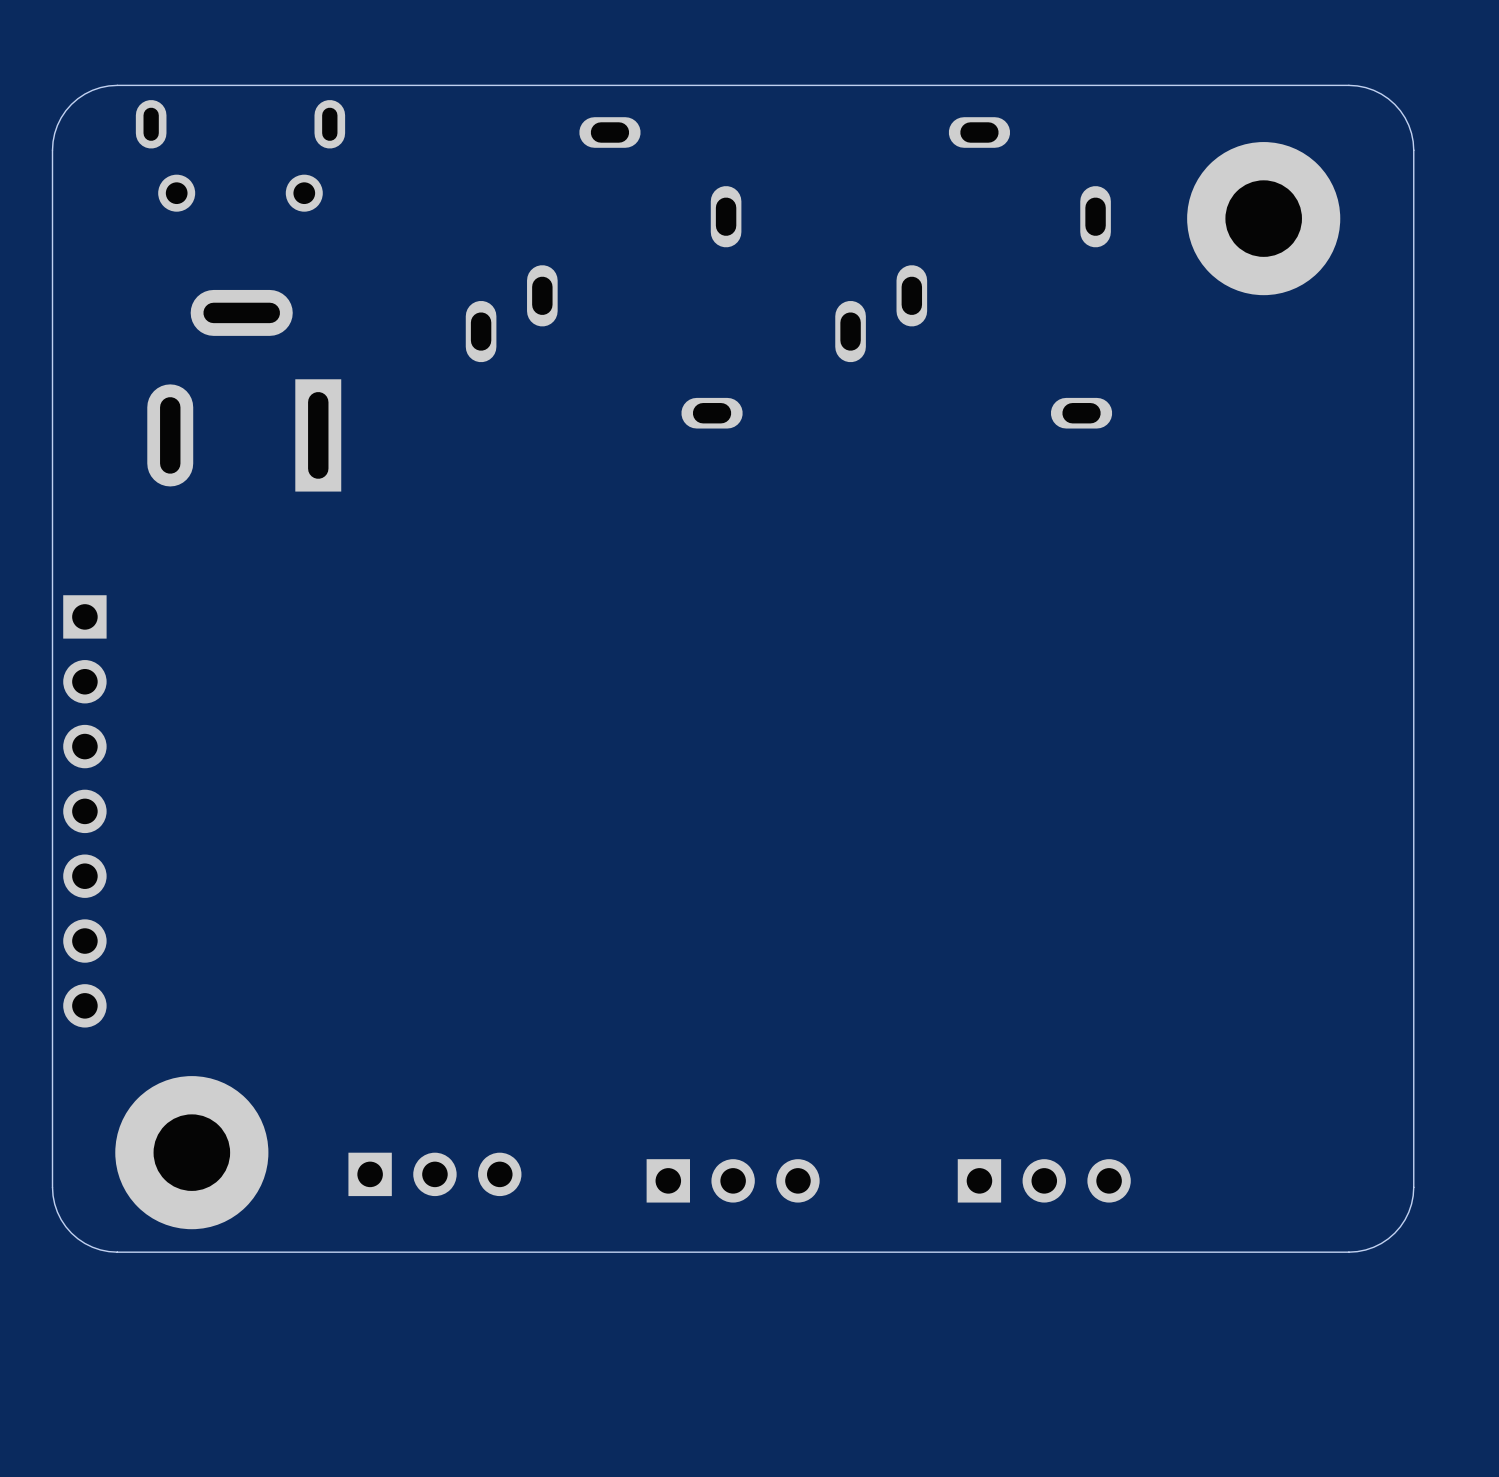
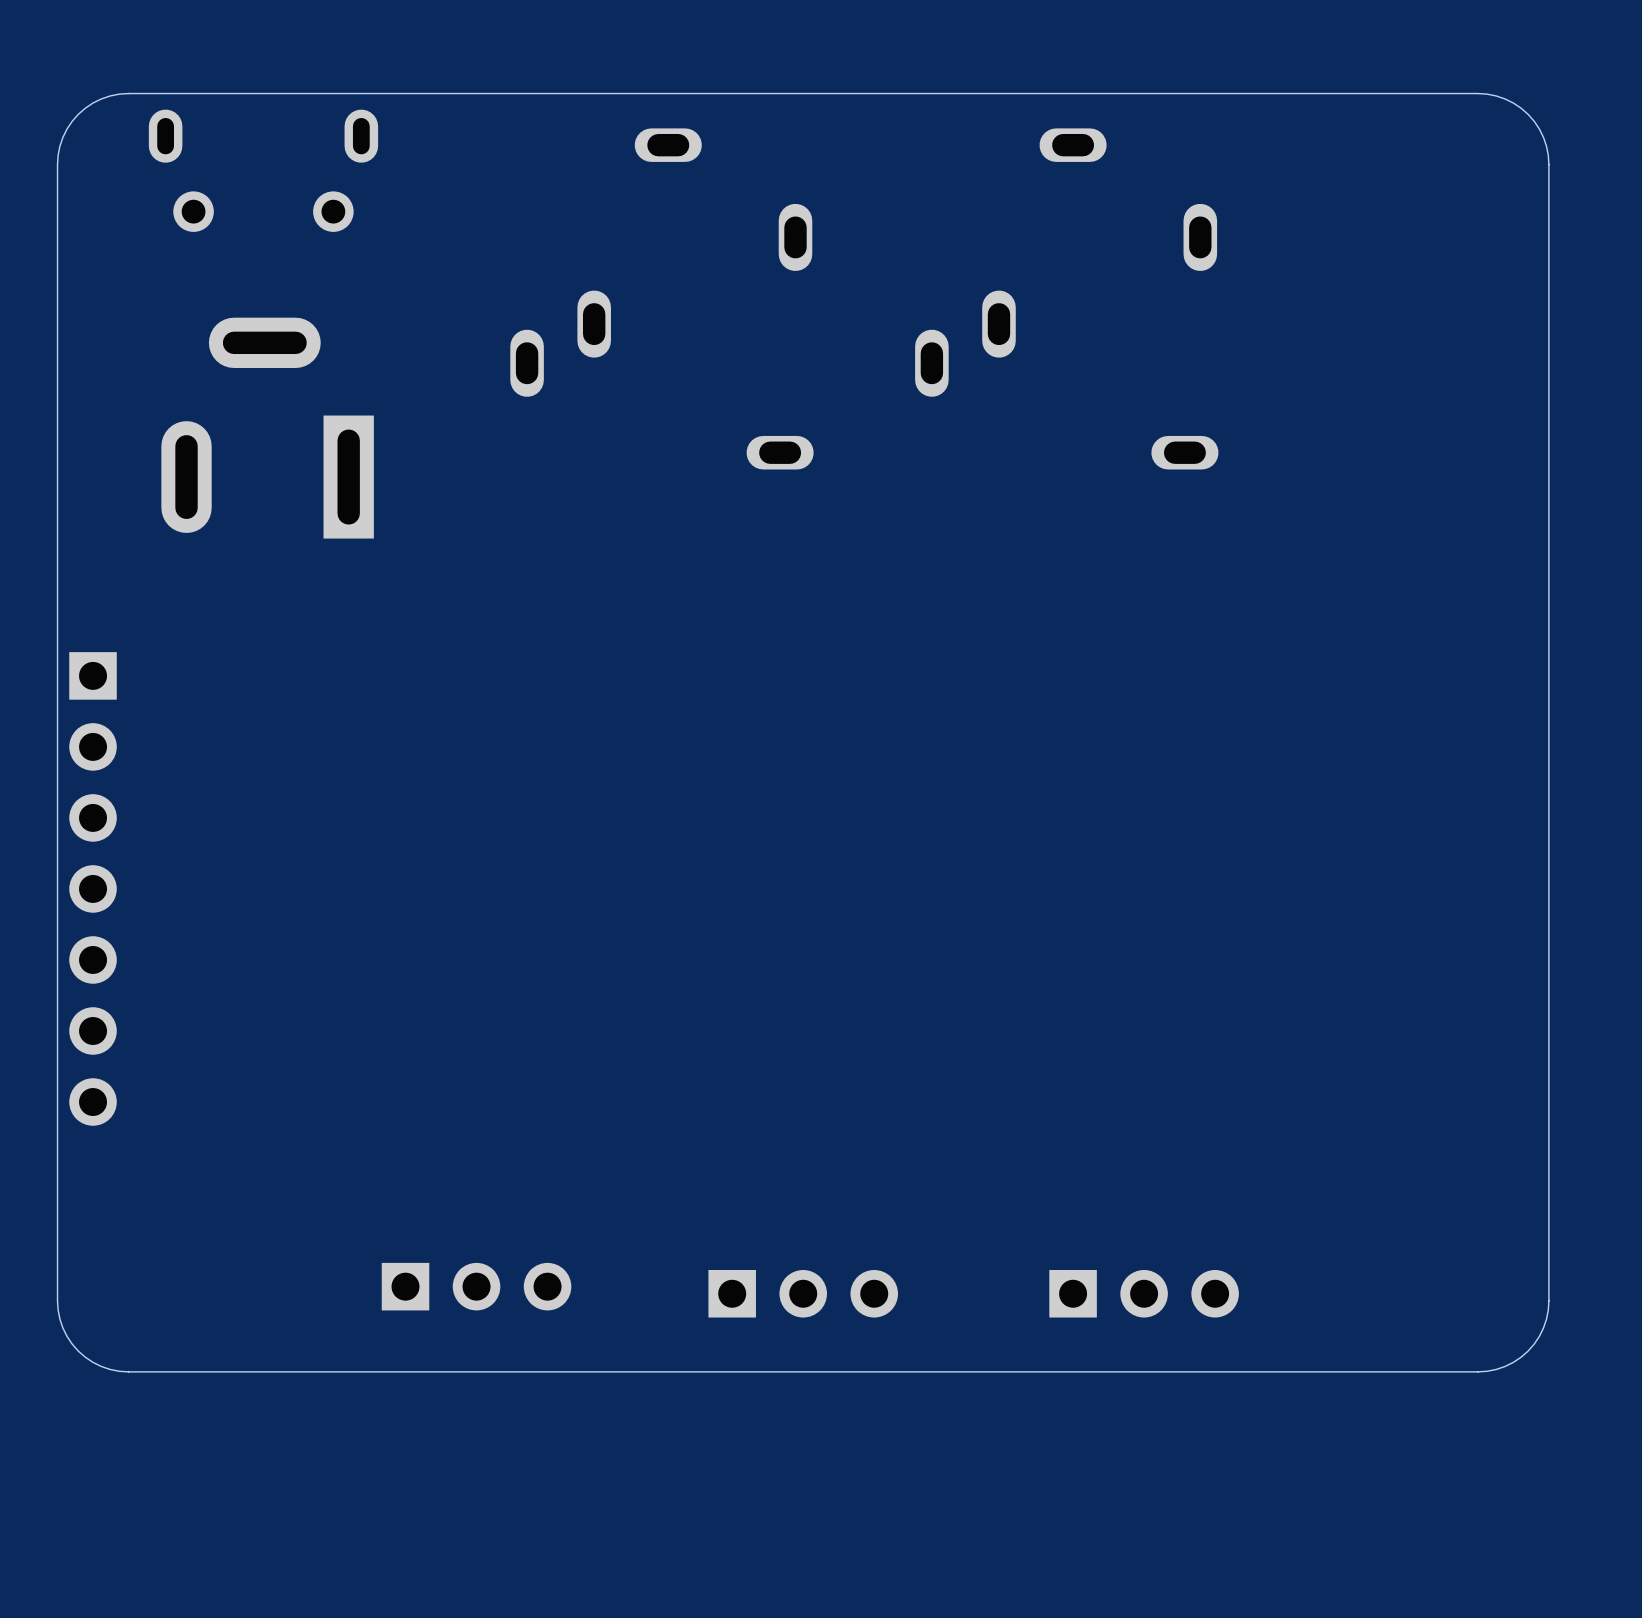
part: (1263, 218) -> none
part: (191, 1152) -> none

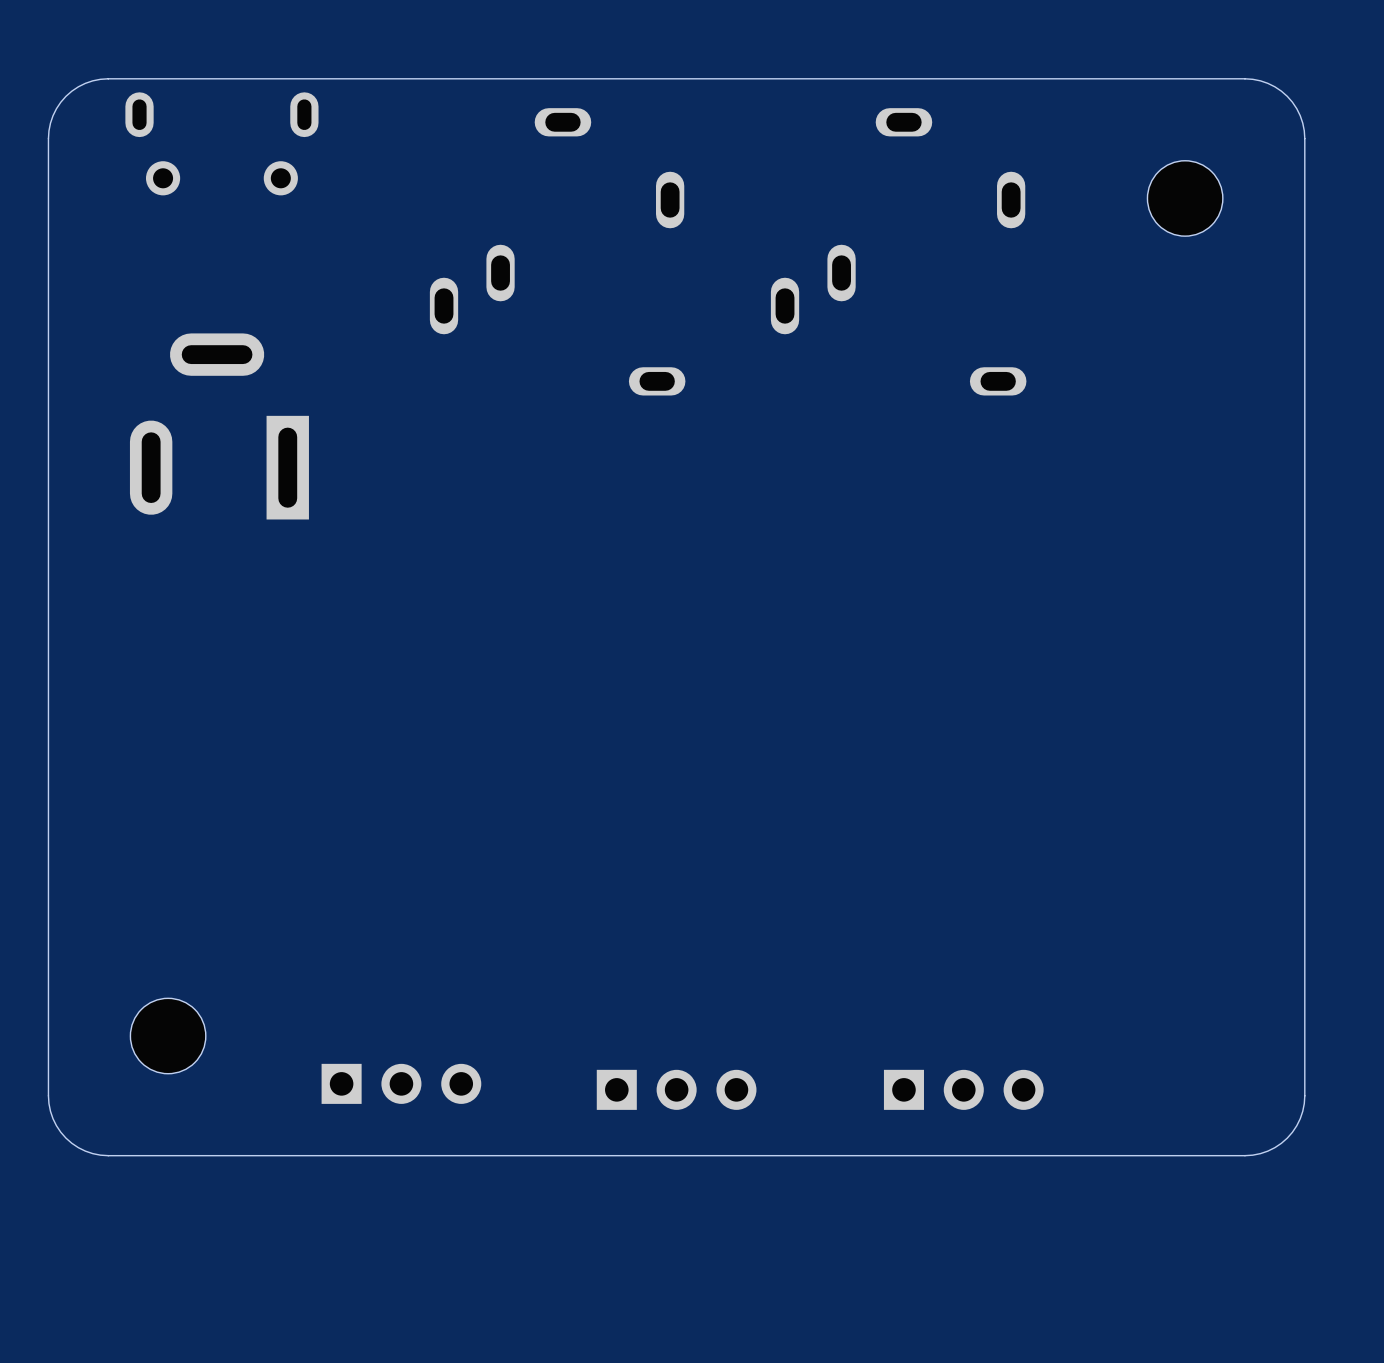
part: none -> (1185, 198)
part position: (267, 428) -> (219, 426)
part: (93, 888) -> none
part: none -> (168, 1036)

